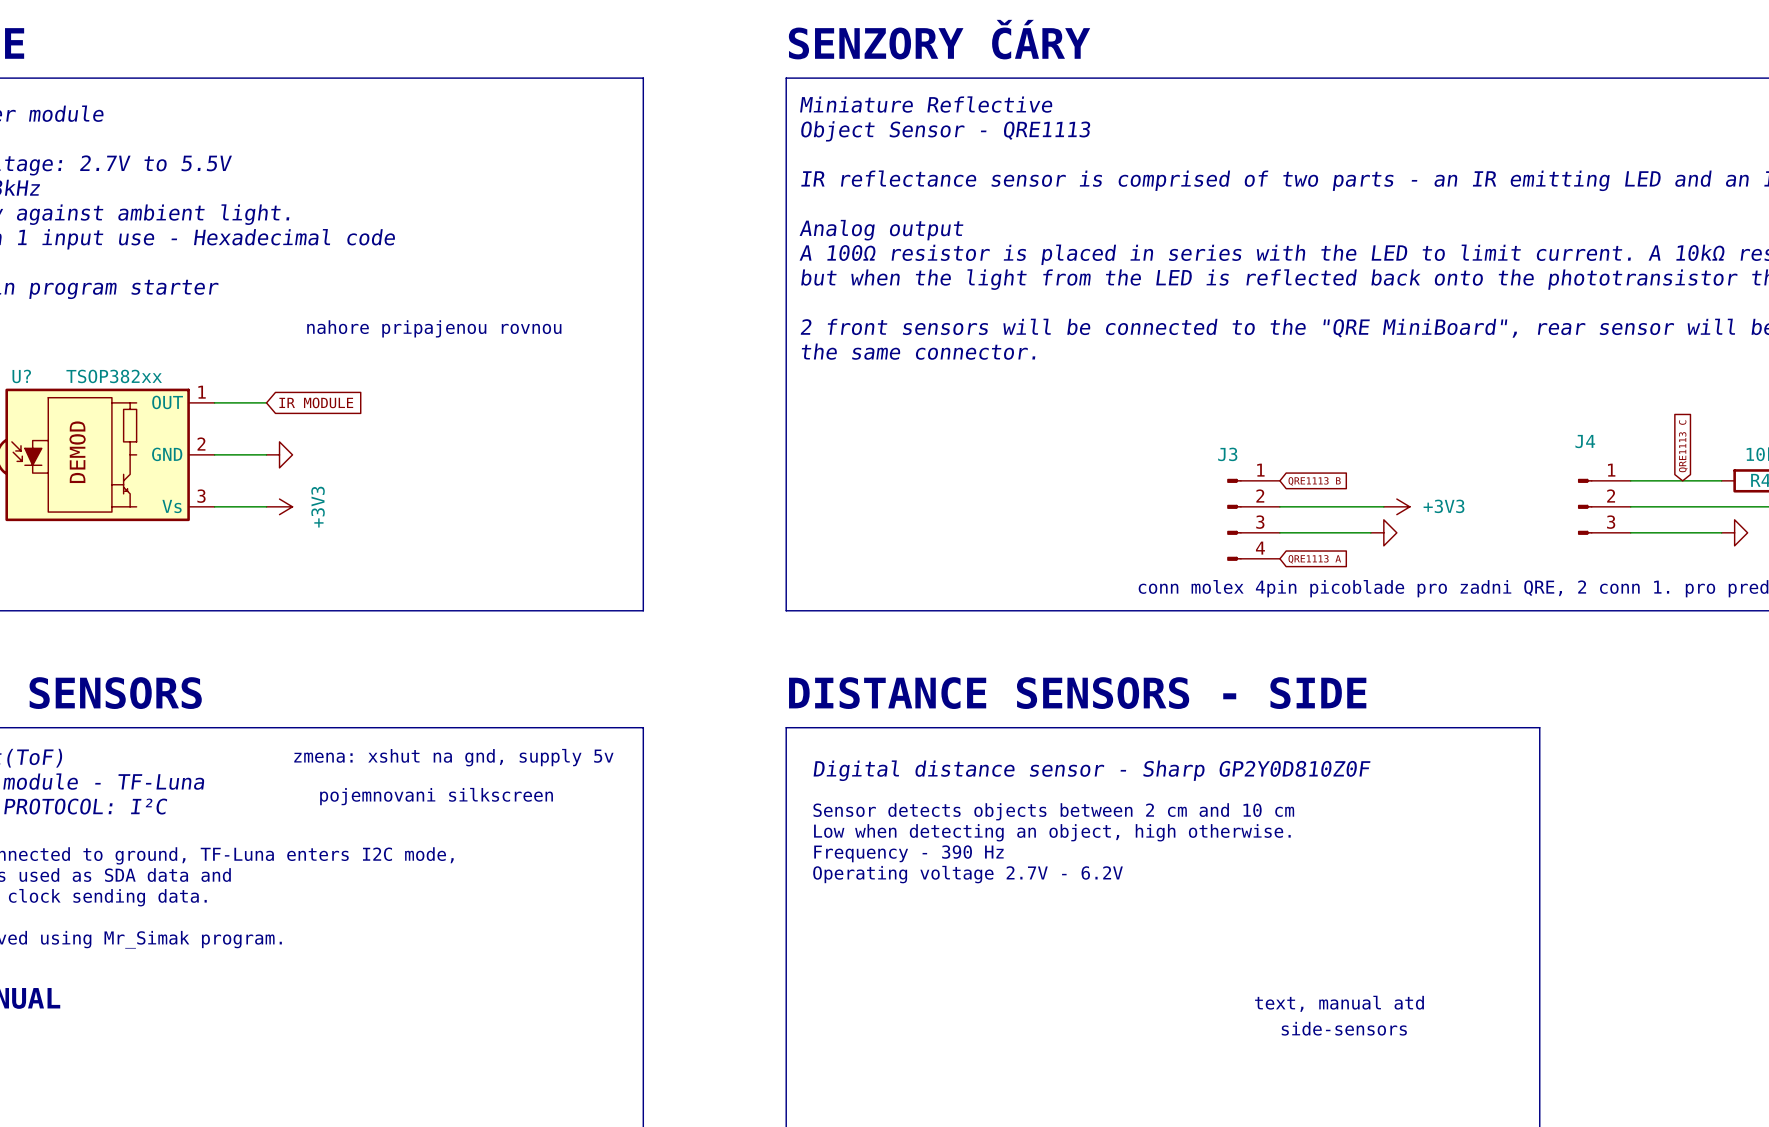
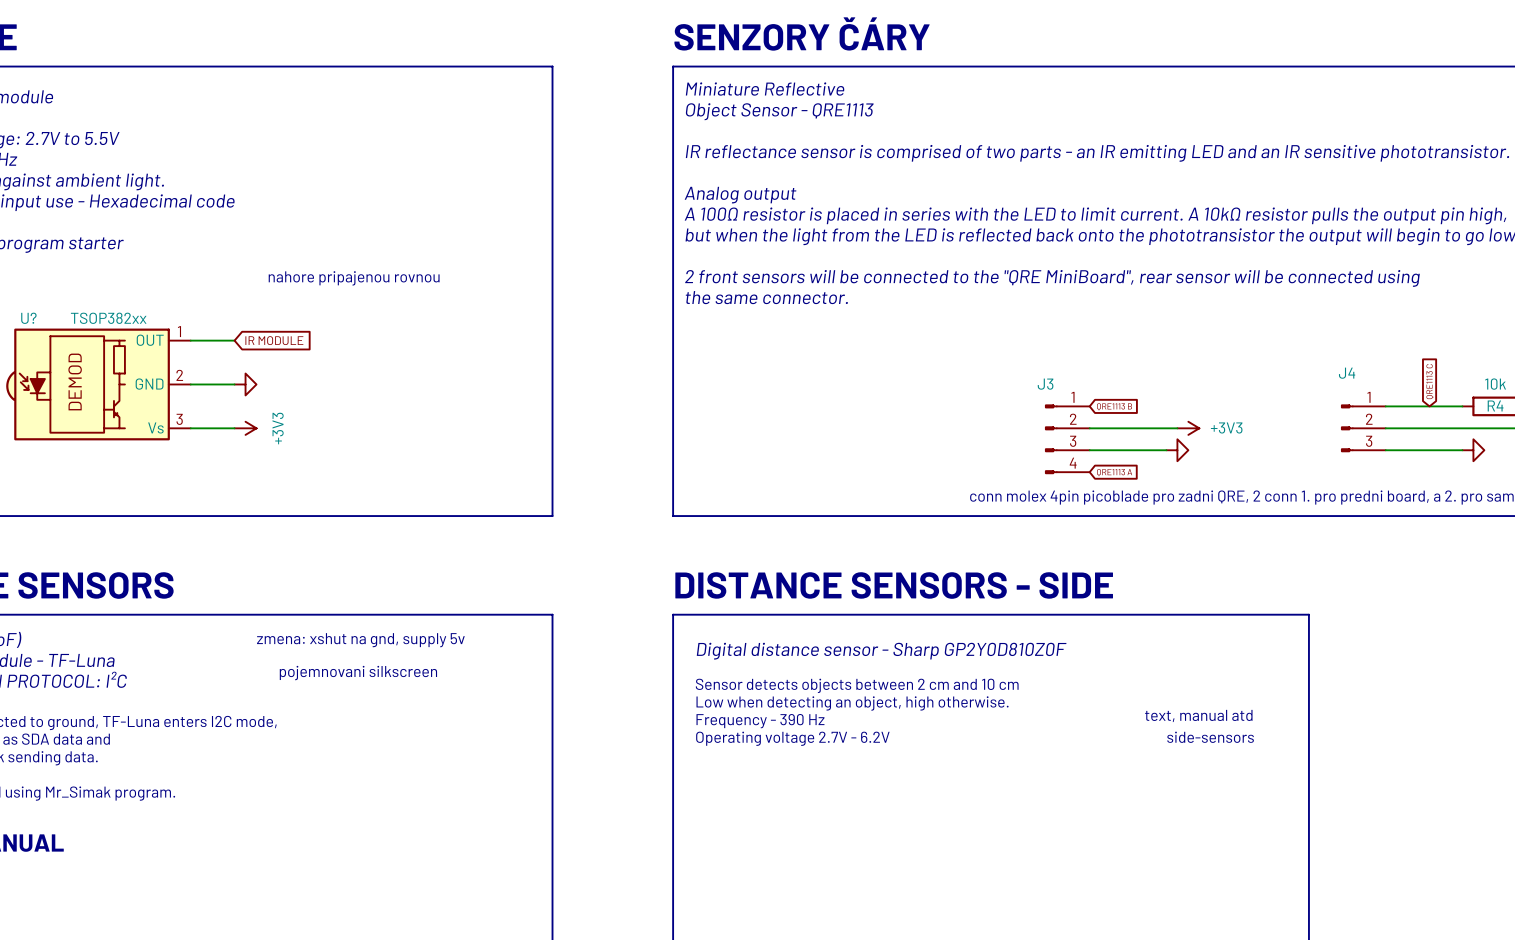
text position: text, manual atd (1339, 1003) -> text, manual atd (1198, 715)
text position: side-sensors (1344, 1028) -> side-sensors (1210, 737)

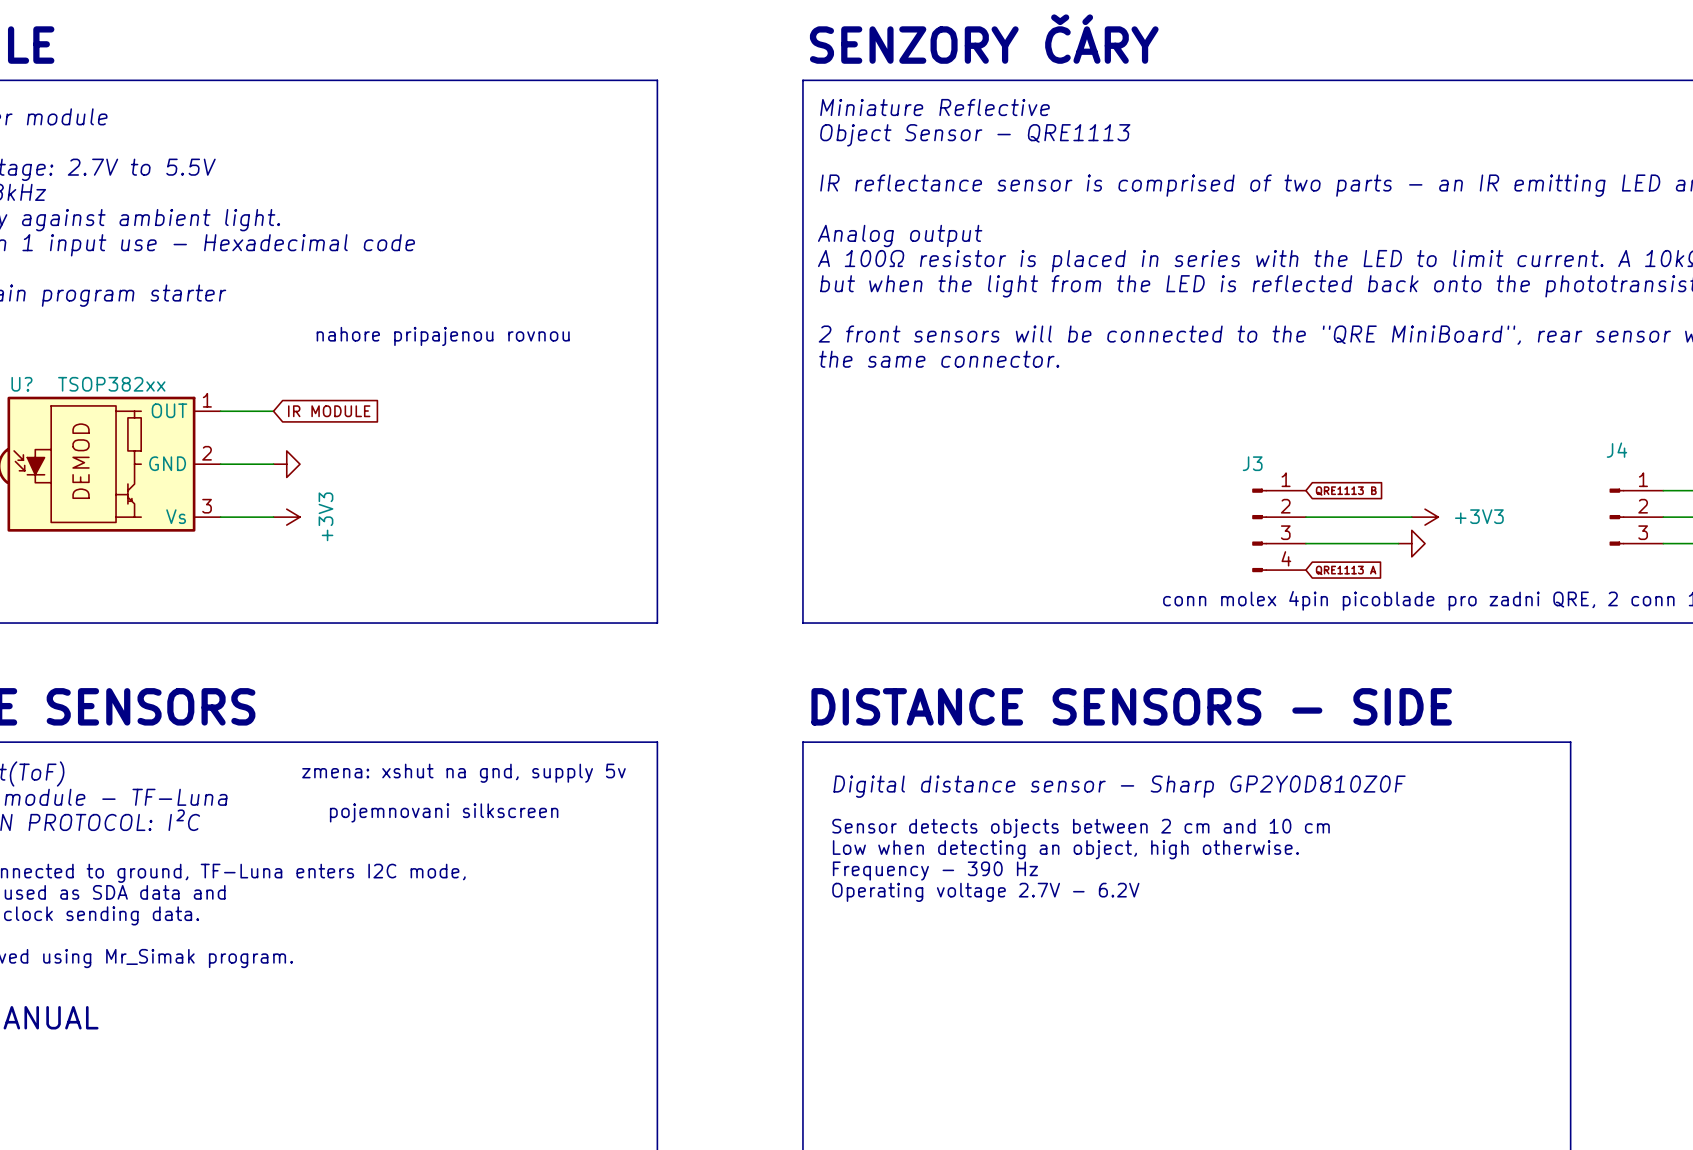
text: text, manual atd (1198, 715) -> none
text: side-sensors (1210, 737) -> none

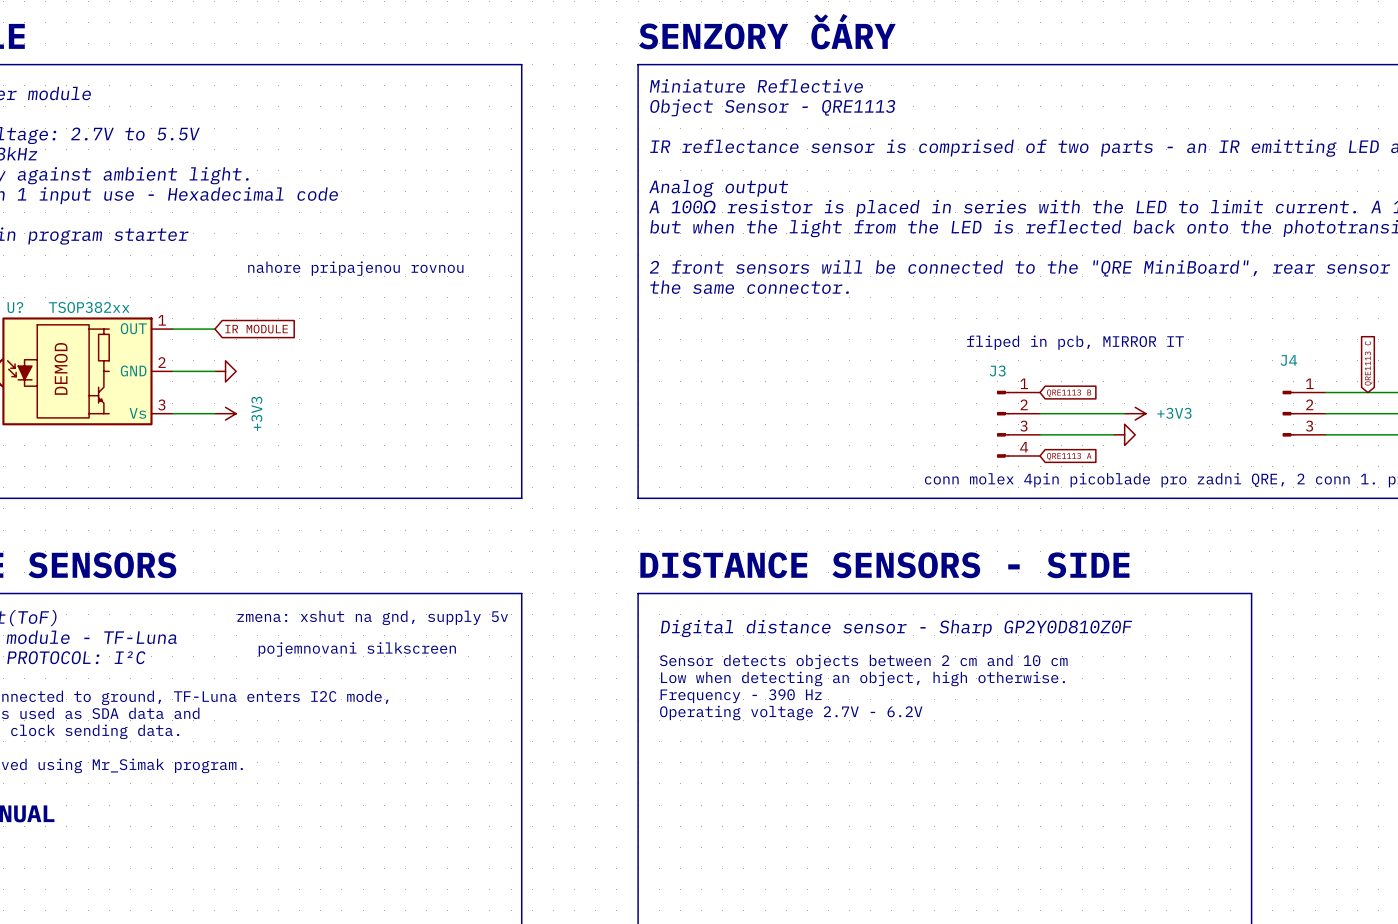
text: none -> fliped in pcb, MIRROR IT (1075, 342)

